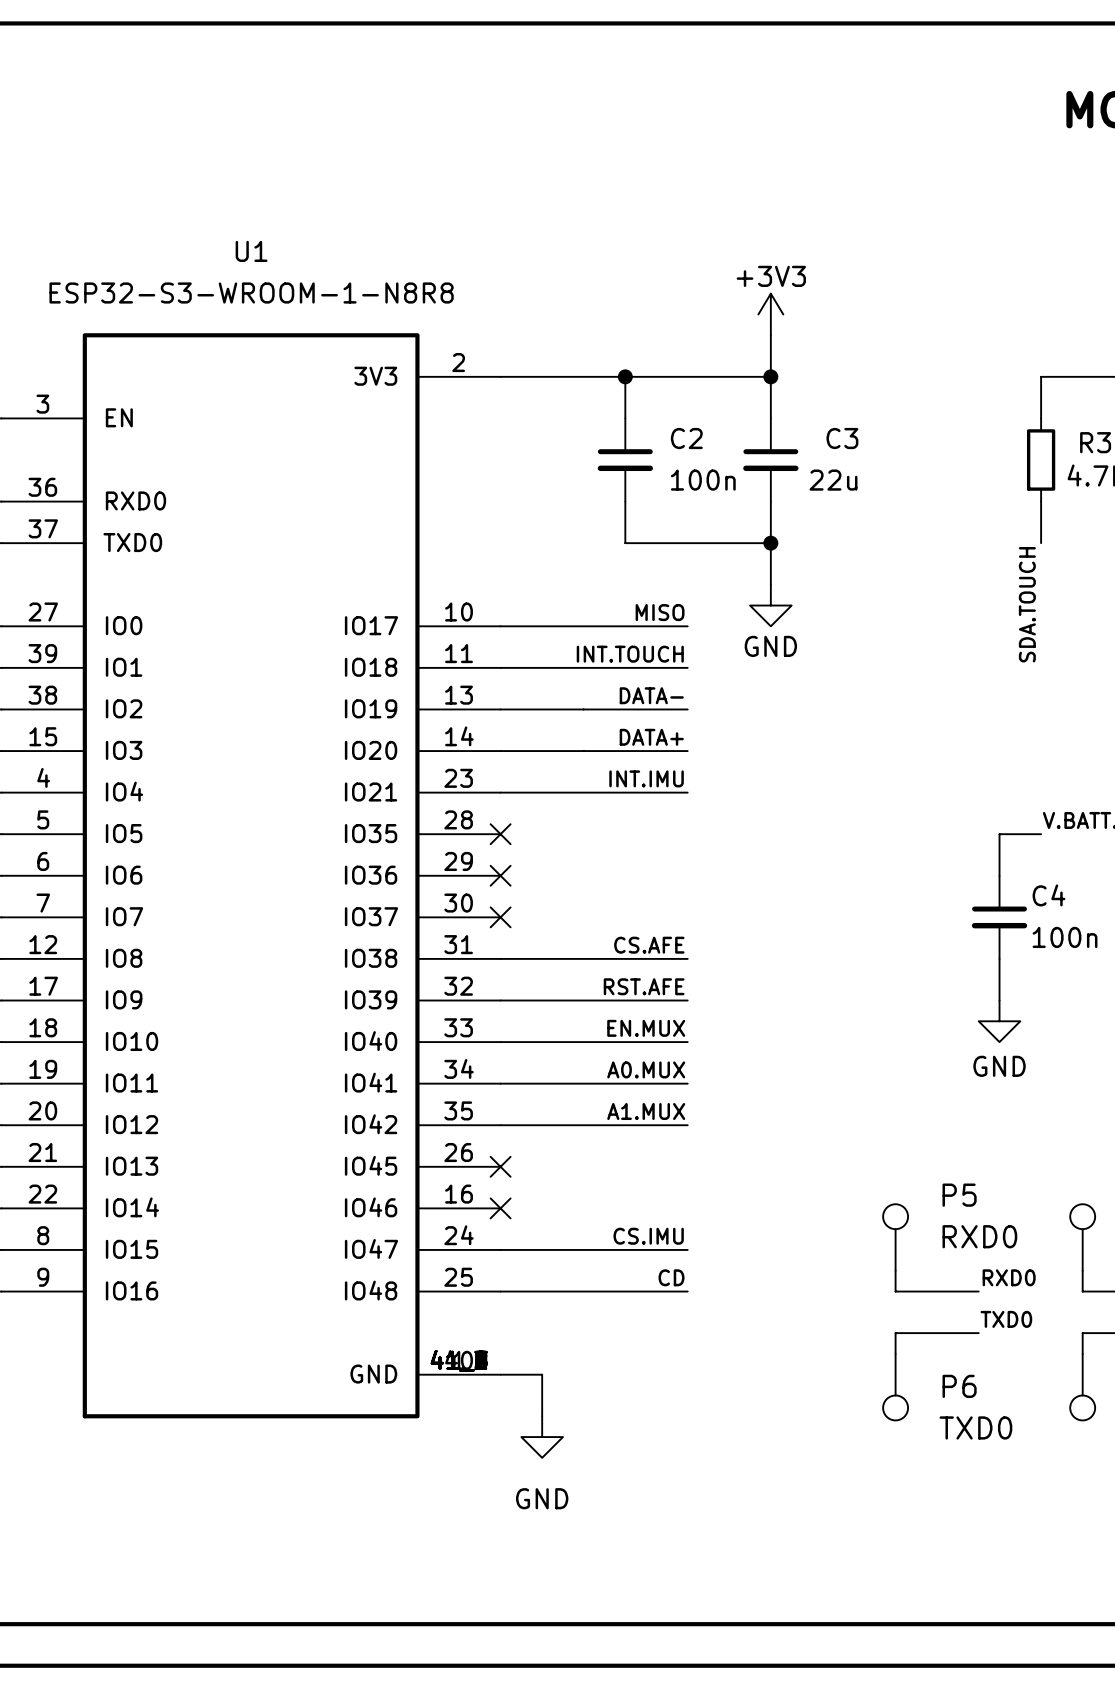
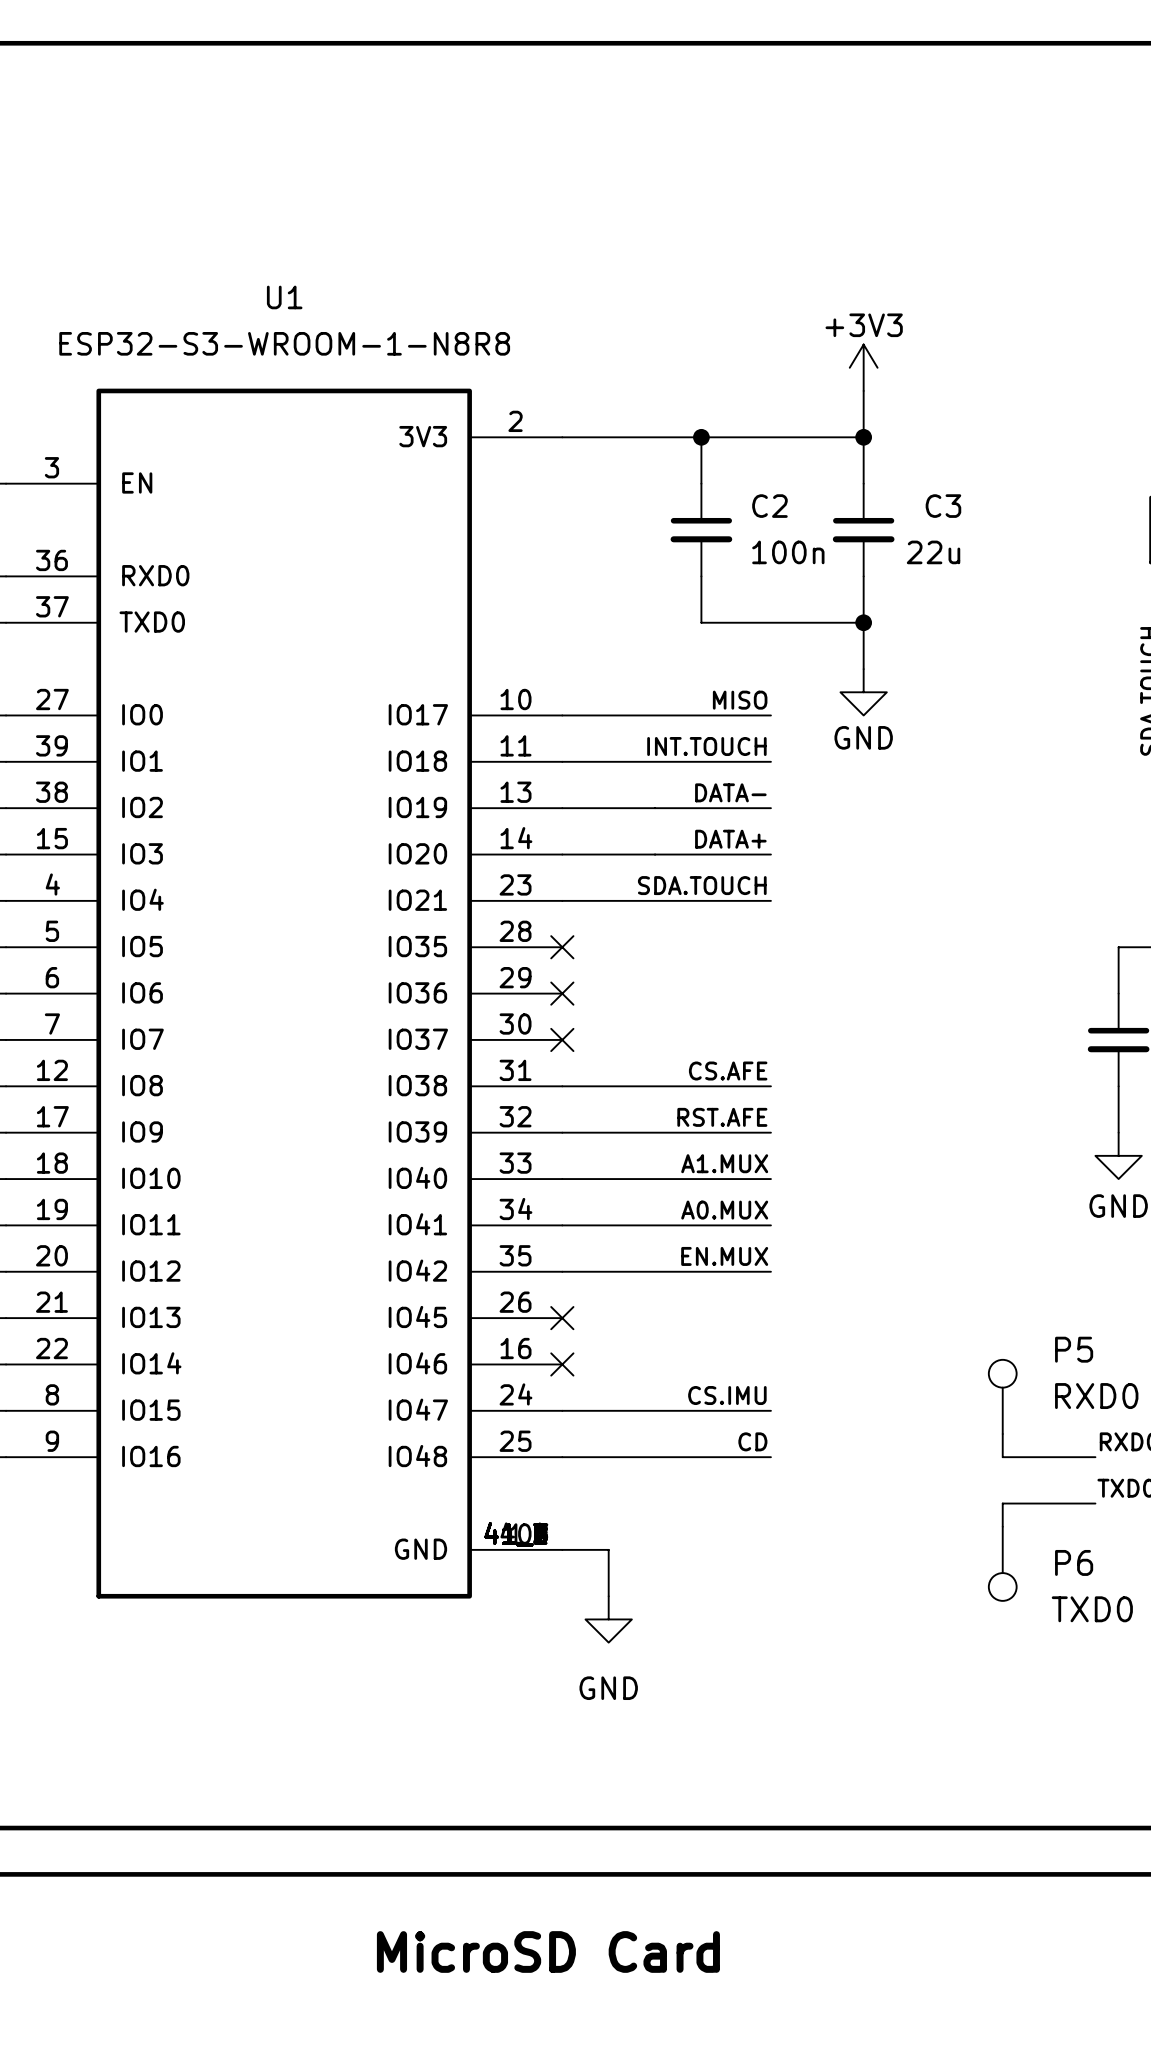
label: INT.IMU (646, 778) -> SDA.TOUCH (702, 885)
label: EN.MUX (646, 1028) -> A1.MUX (724, 1163)
label: A1.MUX (646, 1111) -> EN.MUX (724, 1256)

